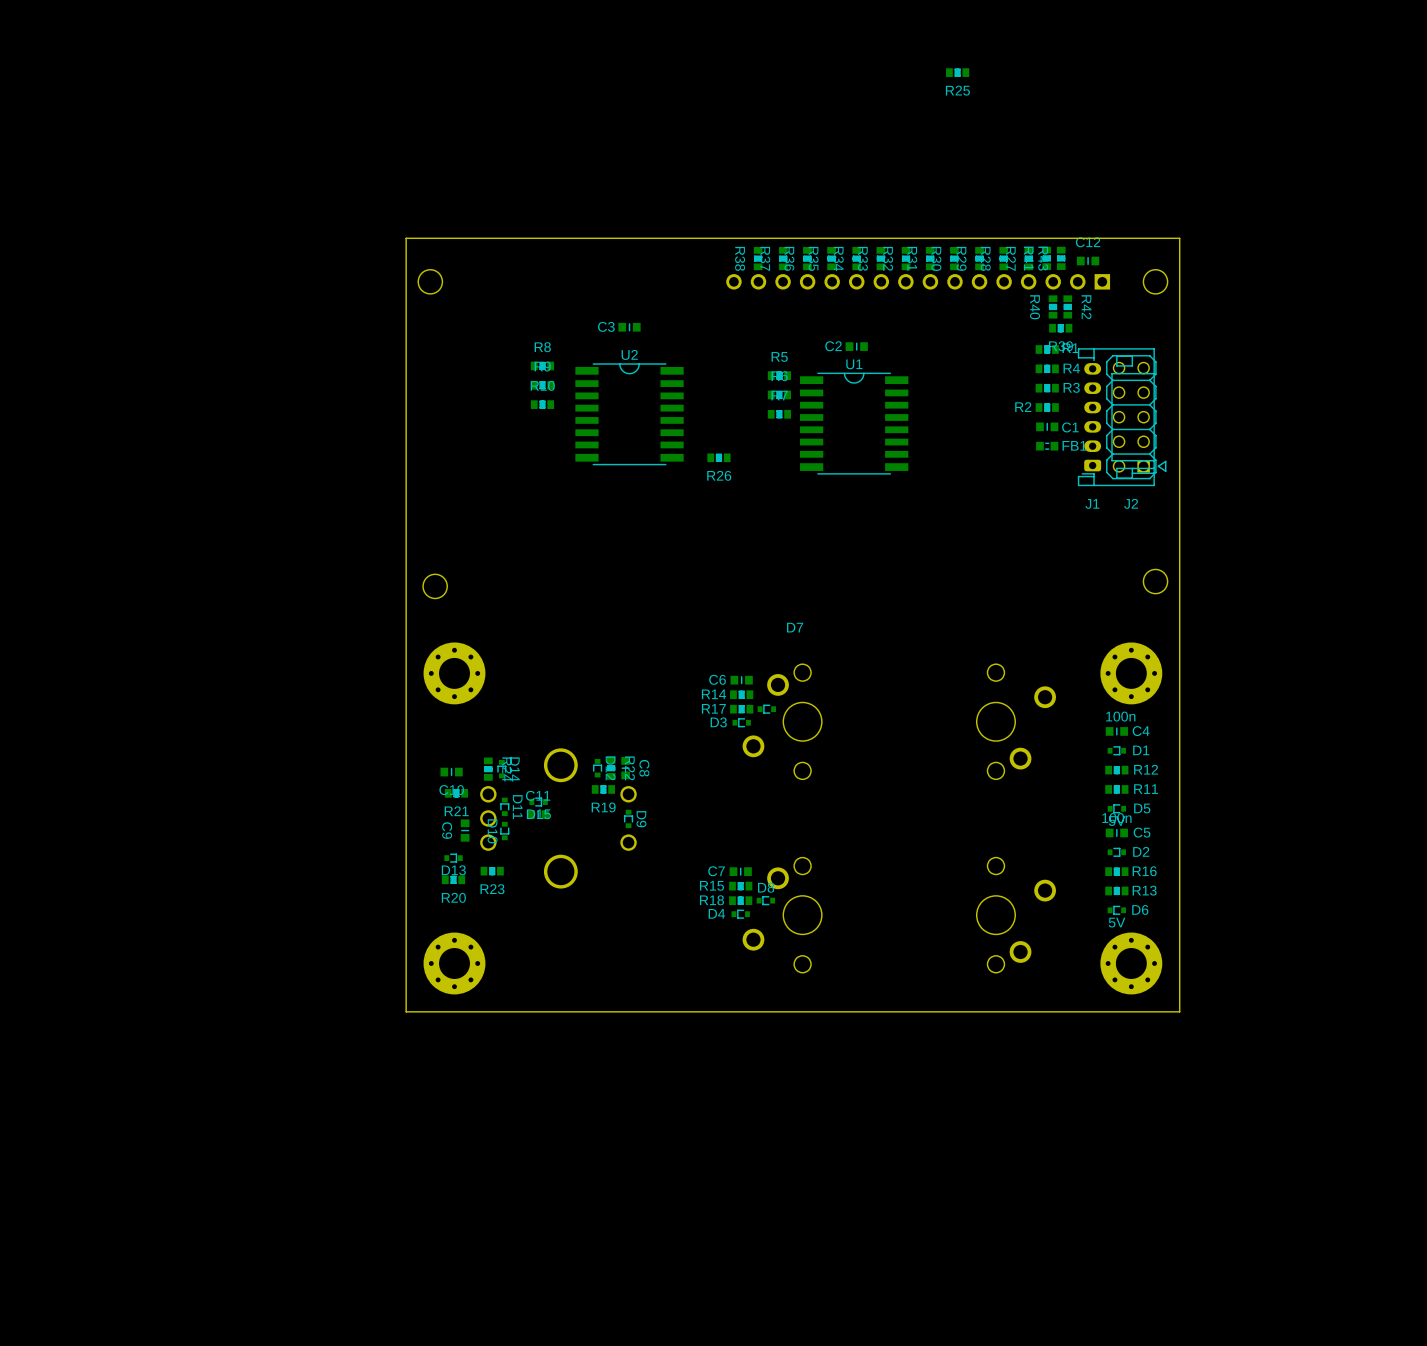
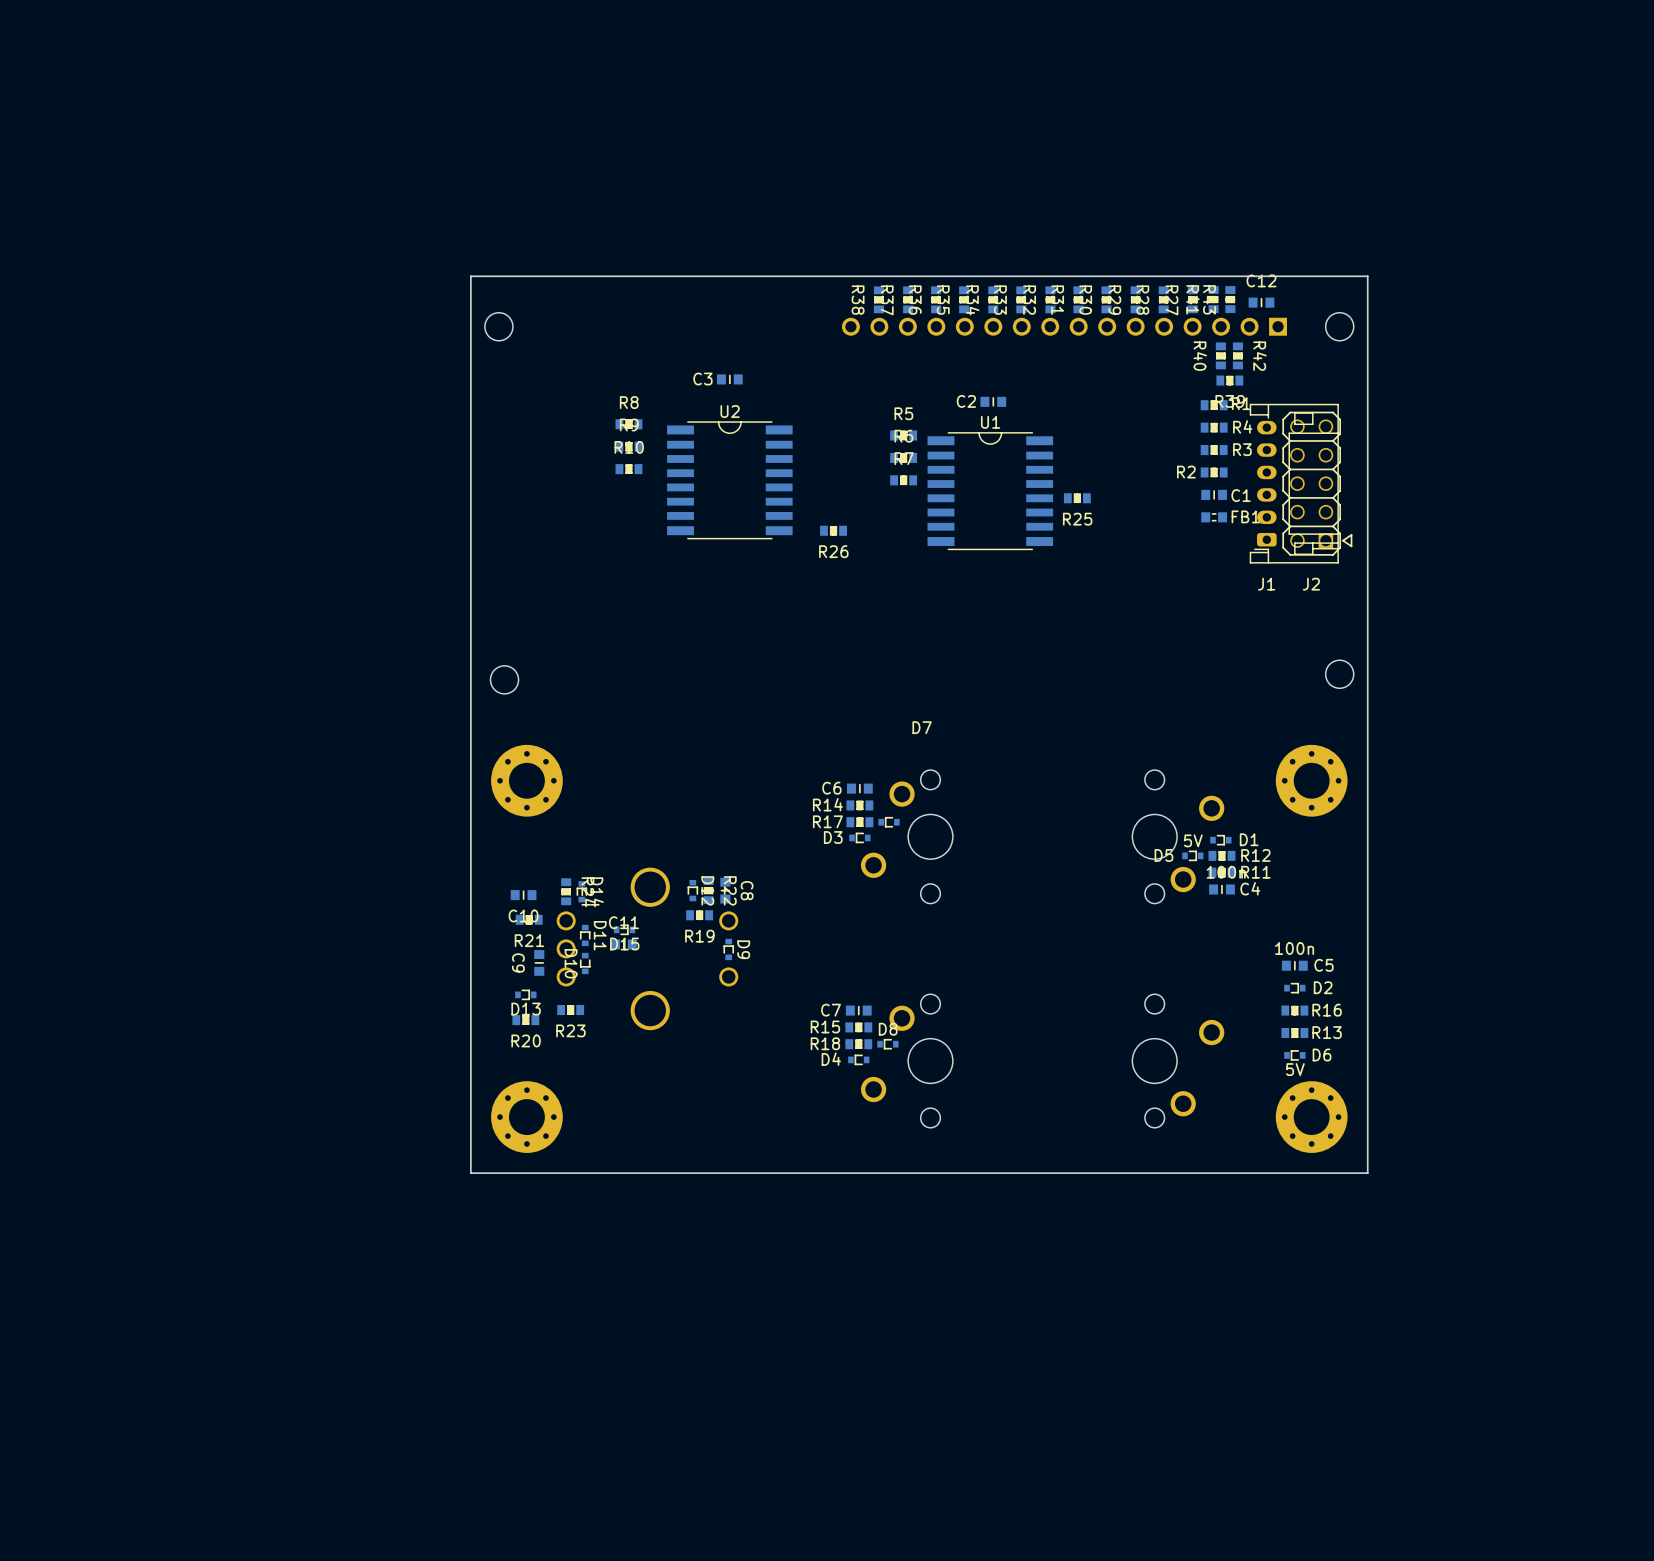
R25 position: (957, 72) -> (1077, 498)
C4 position: (1116, 731) -> (1221, 889)
D1 position: (1116, 750) -> (1220, 840)
R12 position: (1116, 770) -> (1221, 855)
R11 position: (1116, 789) -> (1221, 872)
D5 rotation: 0° (1116, 808) -> 180° (1192, 855)
D5 position: (1116, 808) -> (1192, 855)

